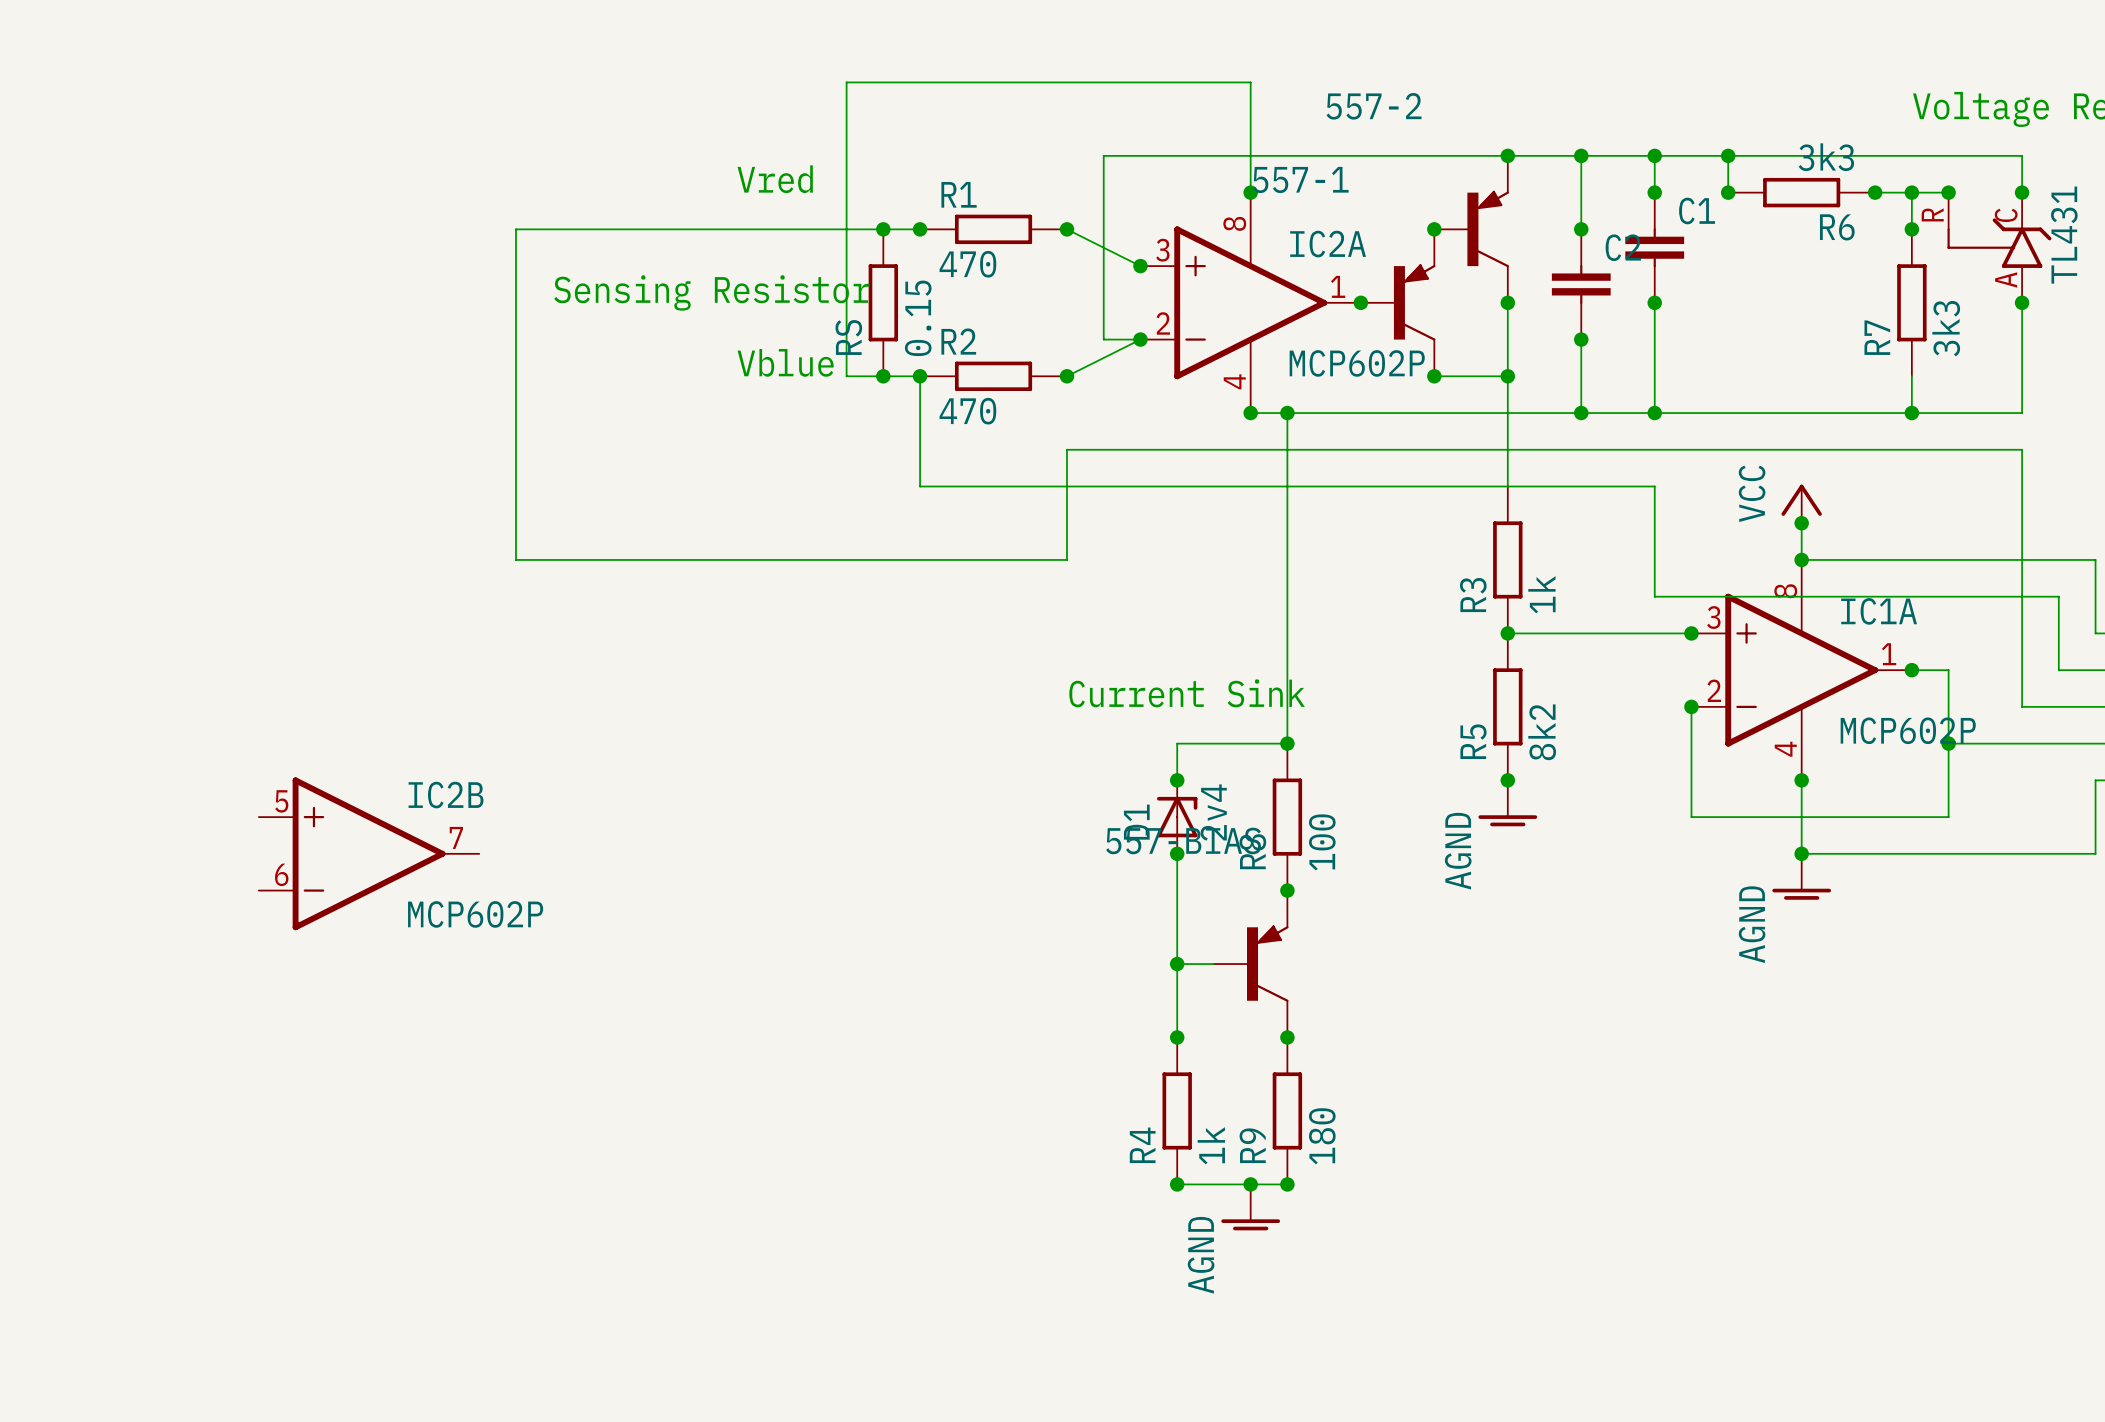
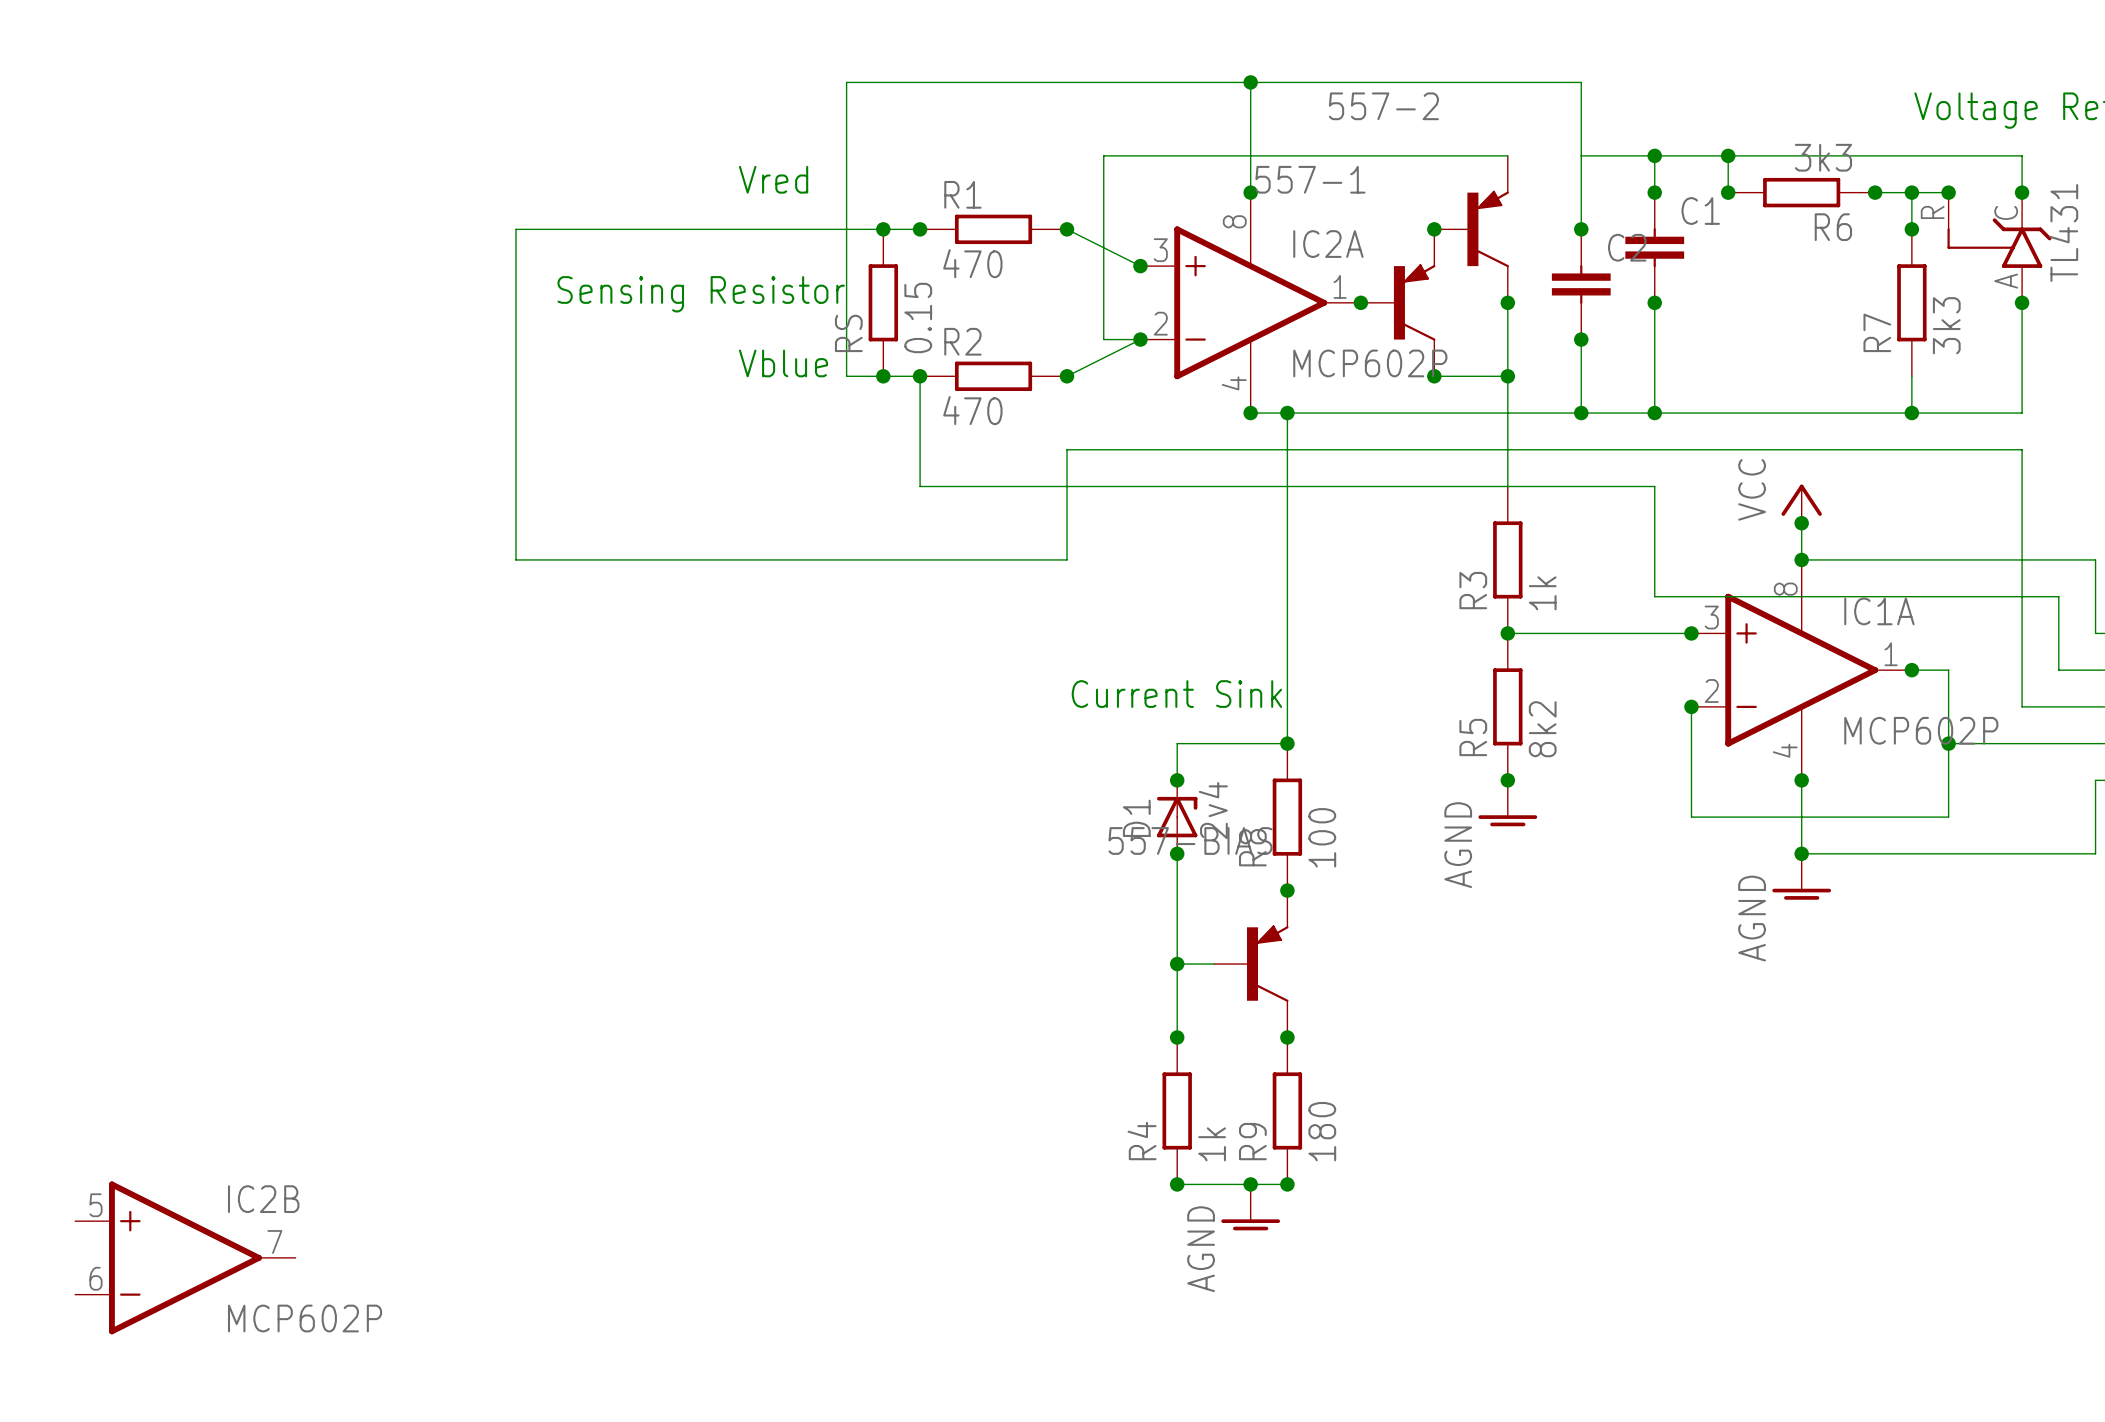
junction: none -> (1250, 82)
wire: (1507, 155) (1581, 155) -> (1250, 82) (1581, 82) (1581, 155)
junction: (1507, 155) -> none
junction: (1581, 155) -> none
IC2B position: (369, 853) -> (185, 1257)

